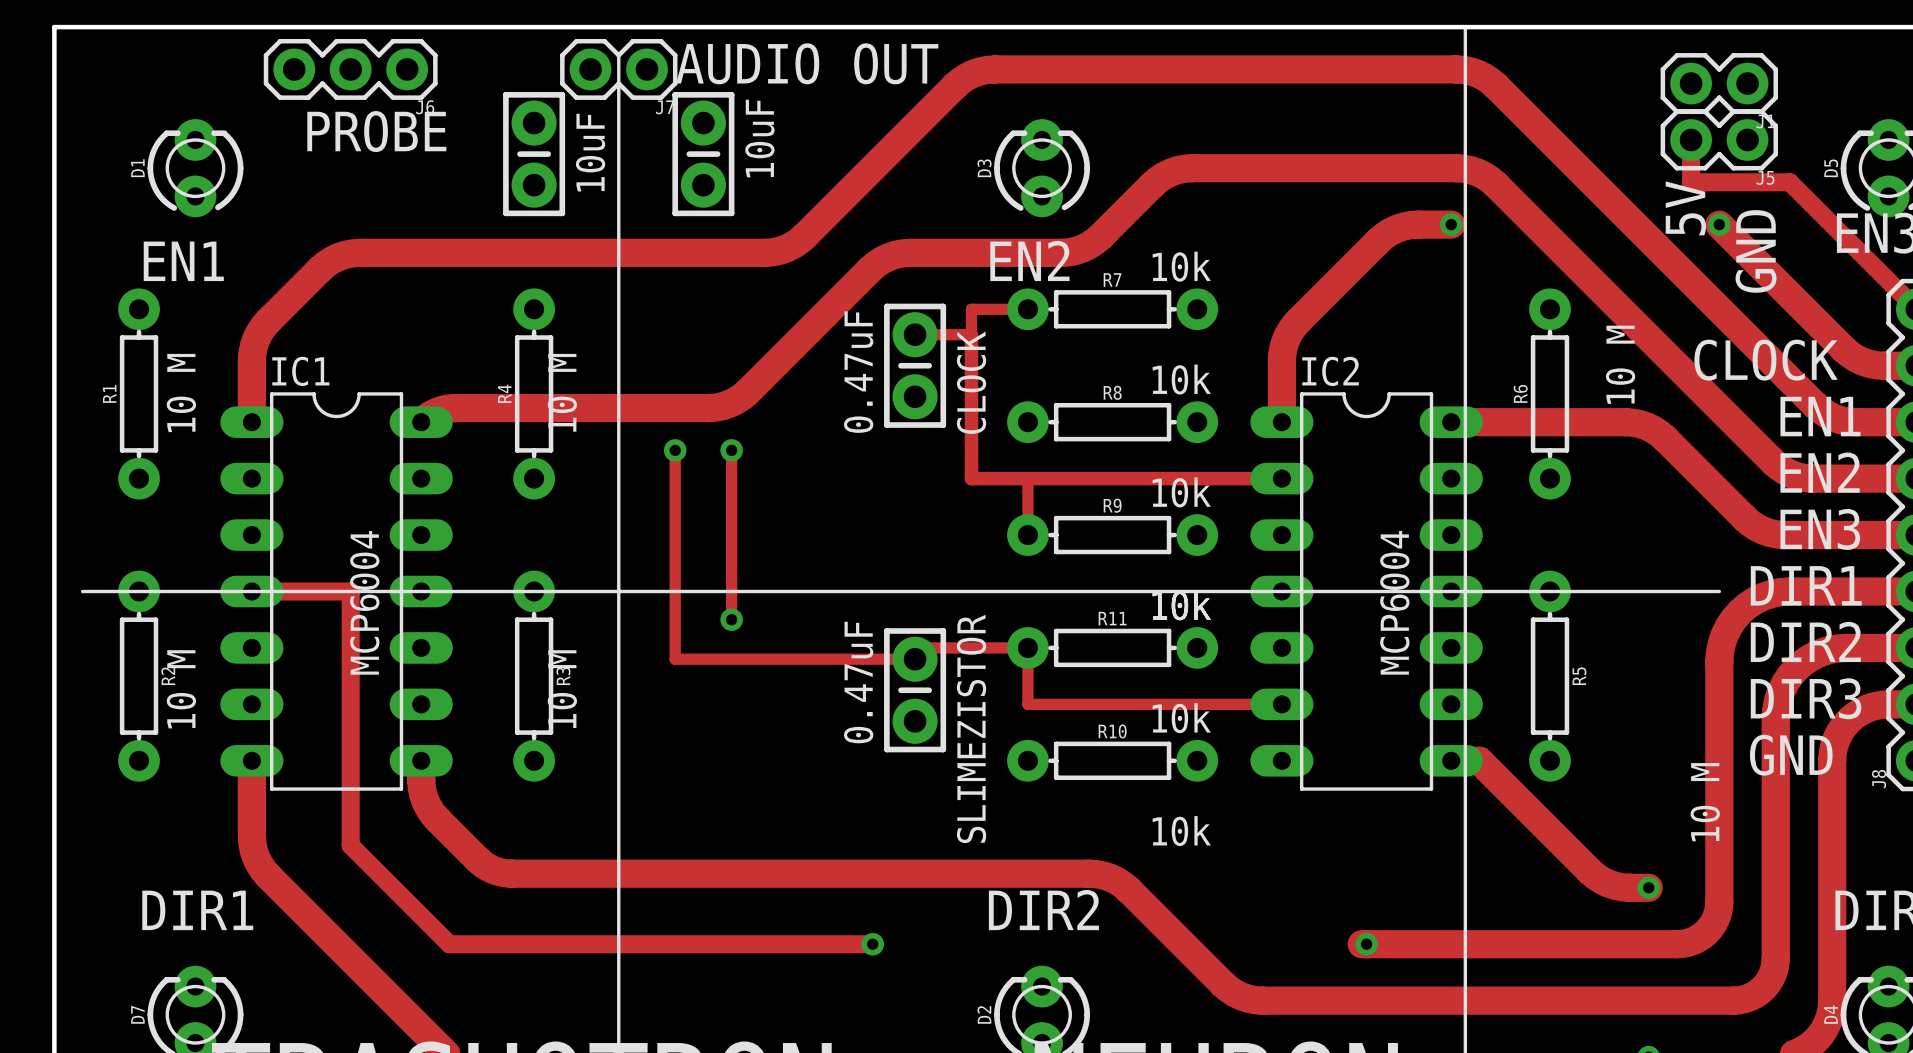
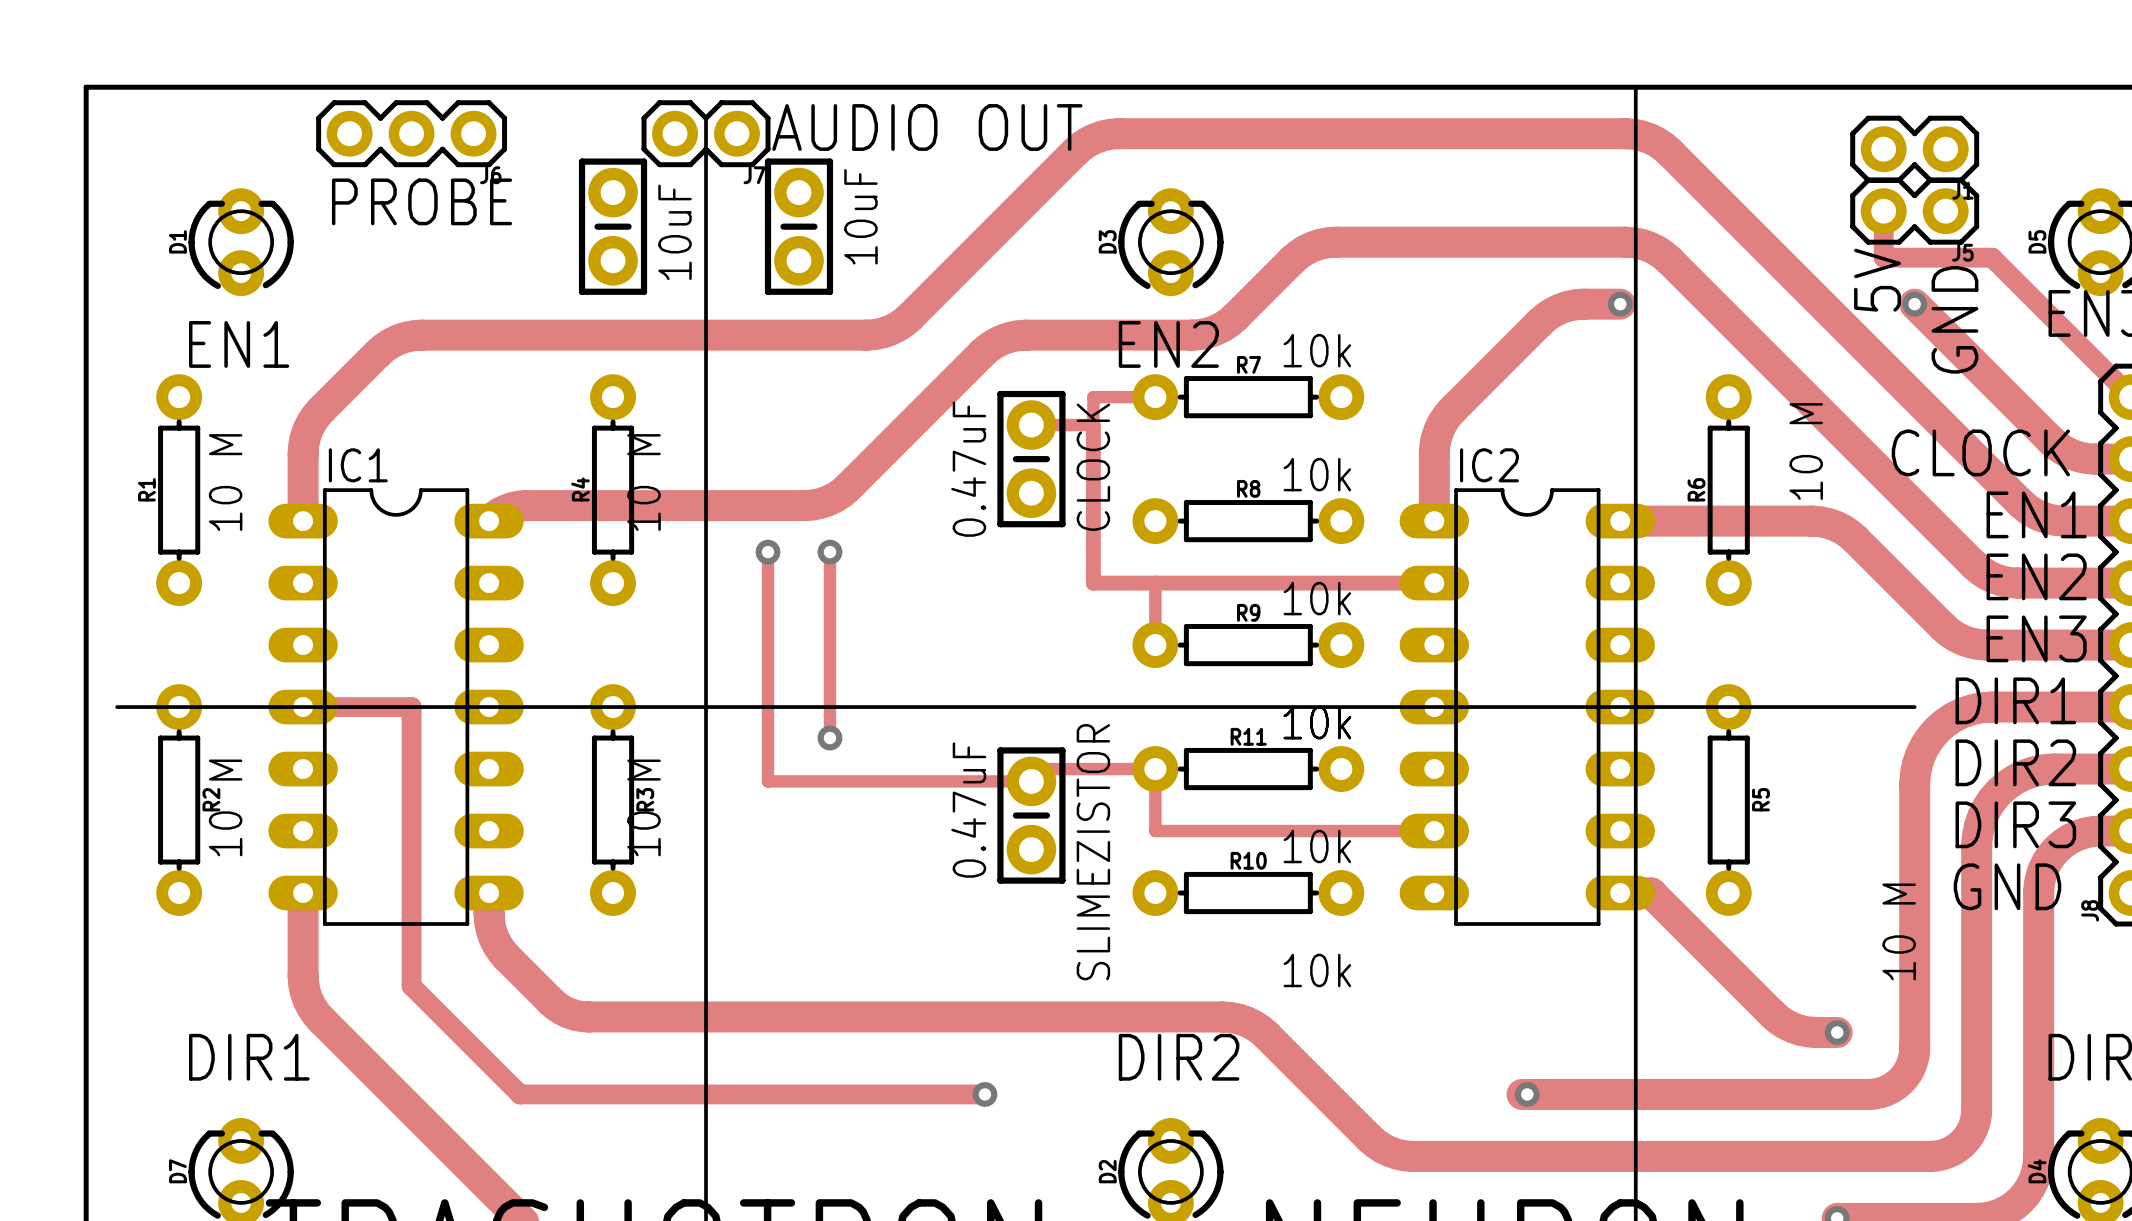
text: MCP6004 (364, 602) -> none
text: MCP6004 (1394, 602) -> none

